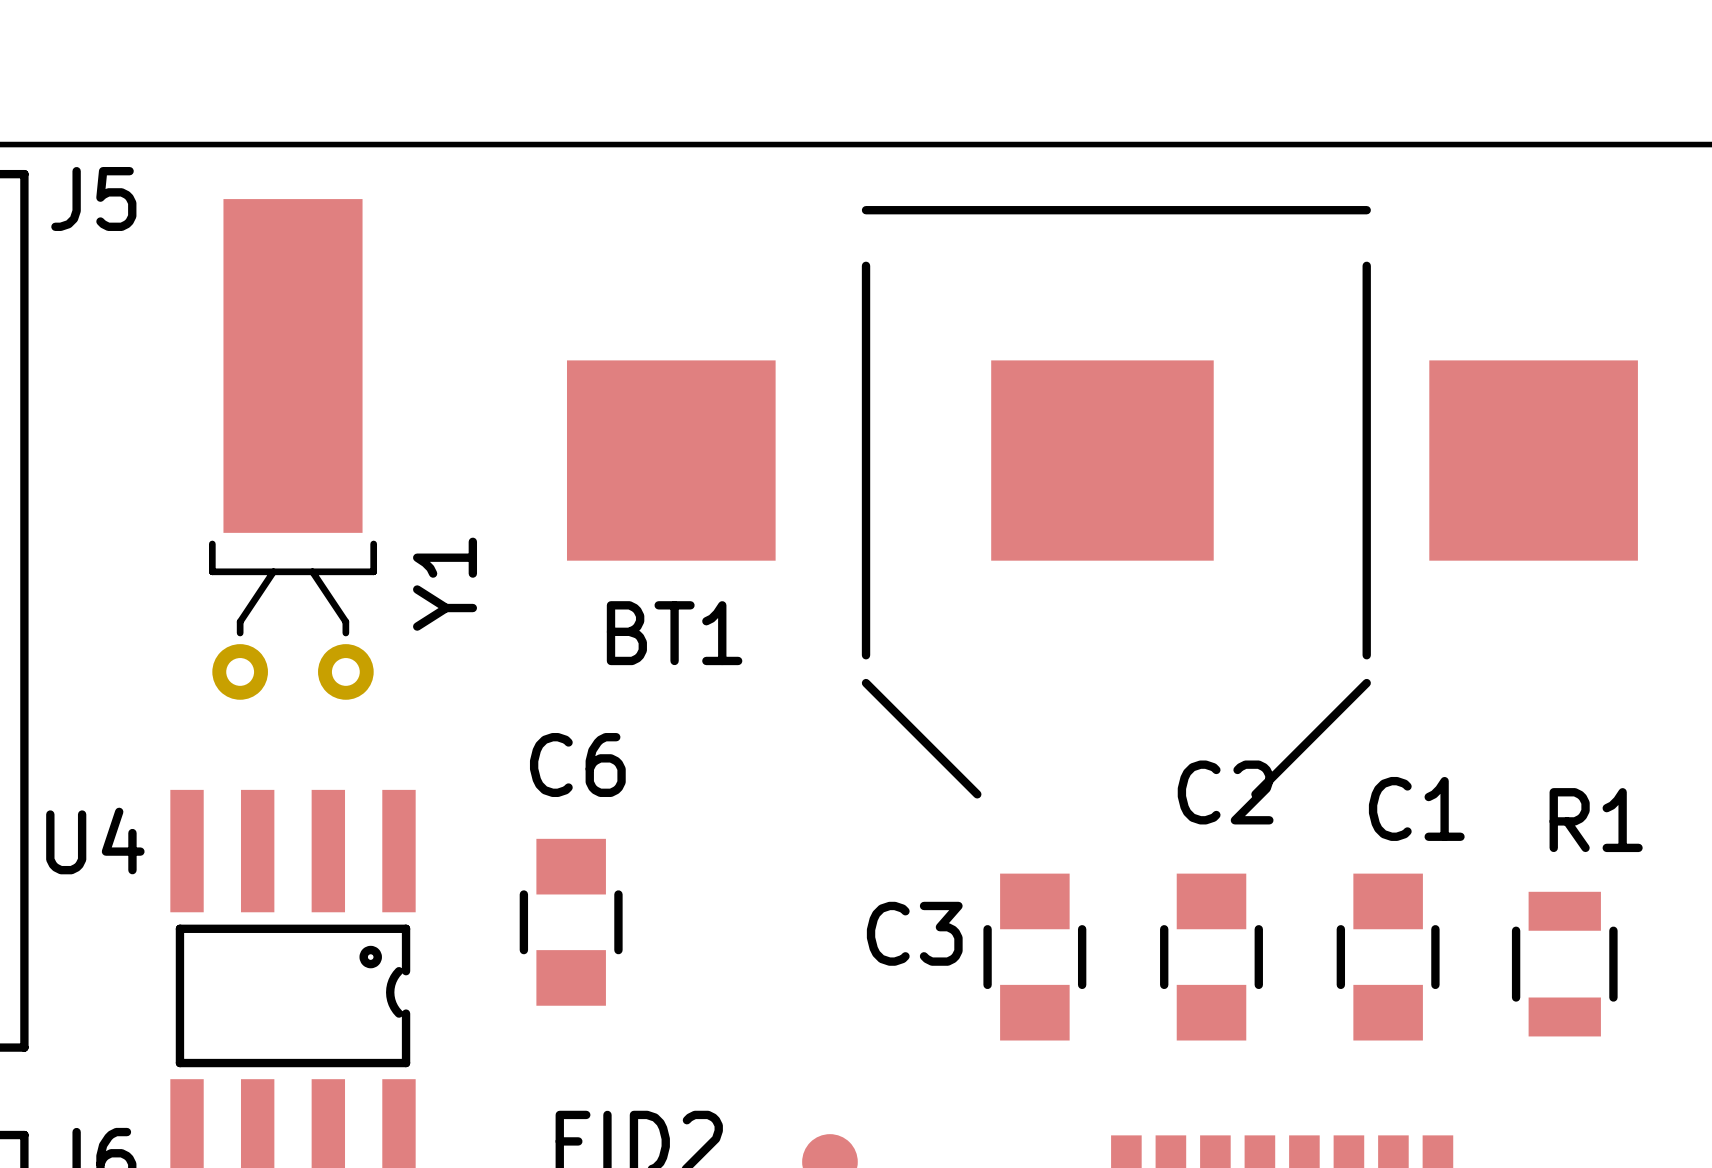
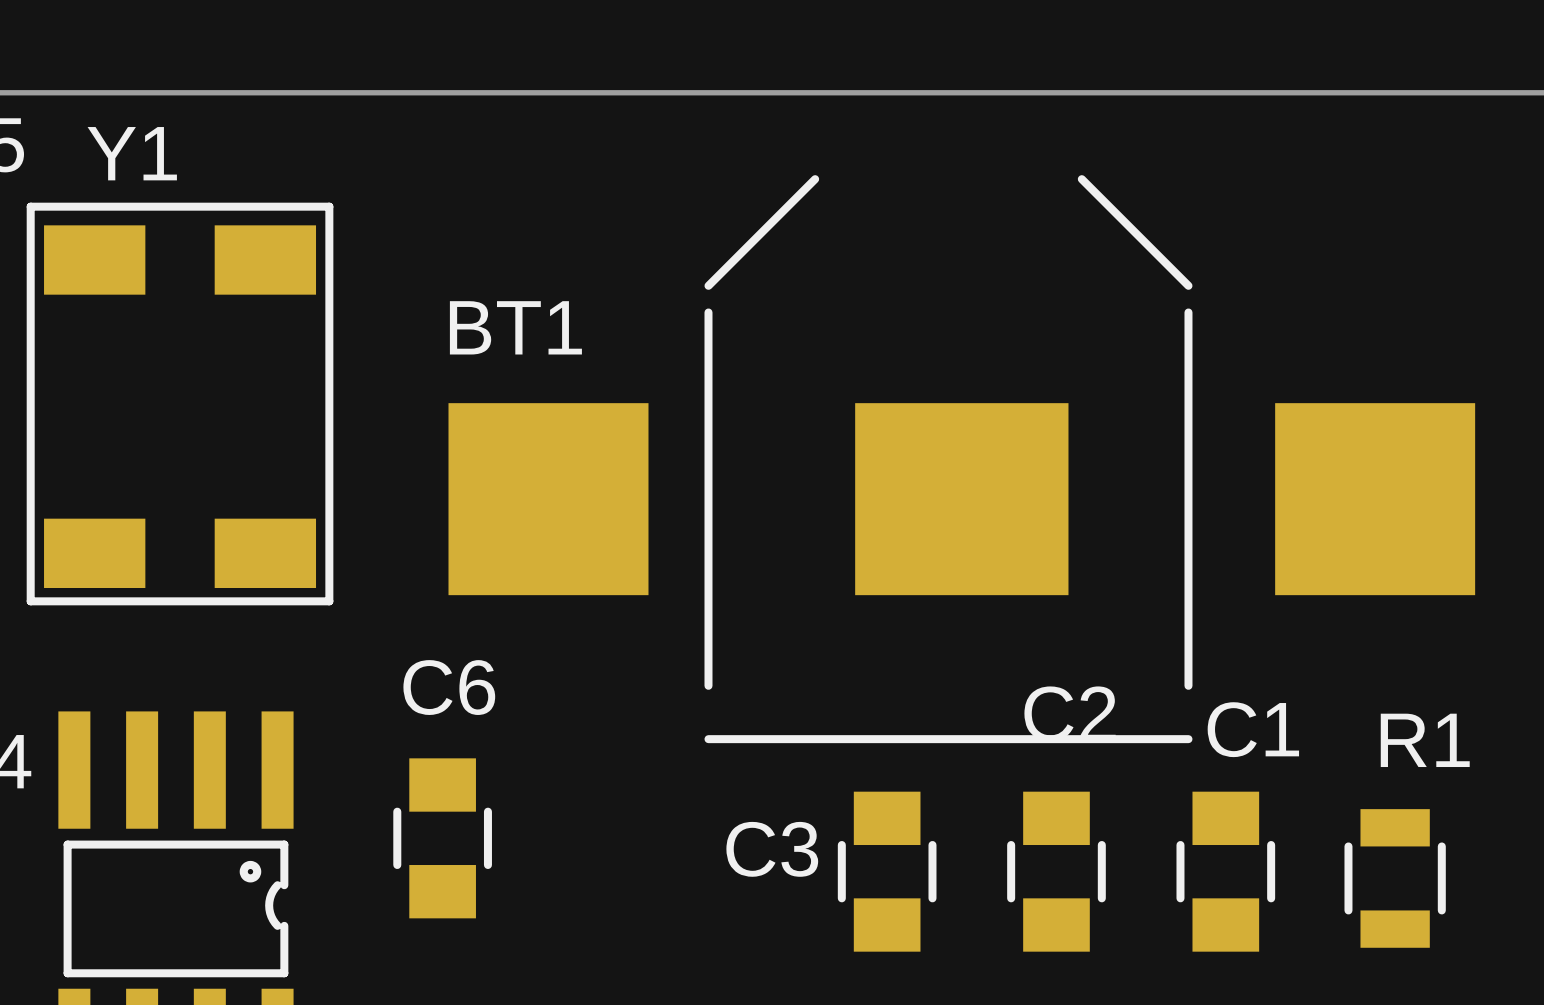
Y1 footprint: [208, 199, 378, 700] -> [26, 202, 334, 606]
BT1 rotation: 0° (1102, 502) -> 180° (961, 459)
Y1 name position: Y1 (445, 584) -> Y1 (132, 153)
BT1 name position: BT1 (674, 633) -> BT1 (515, 327)

